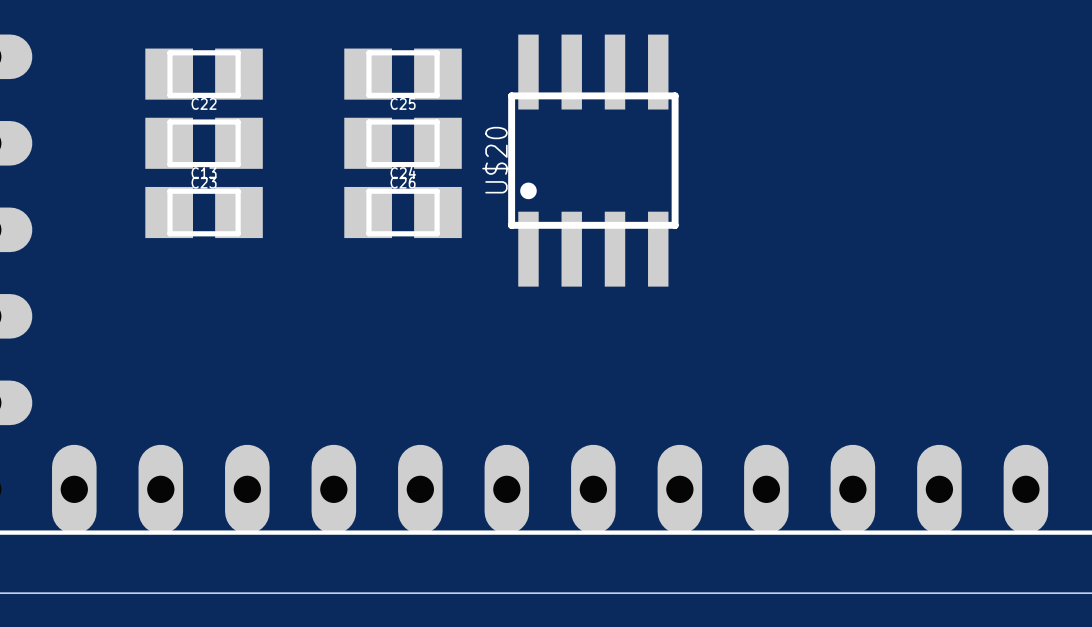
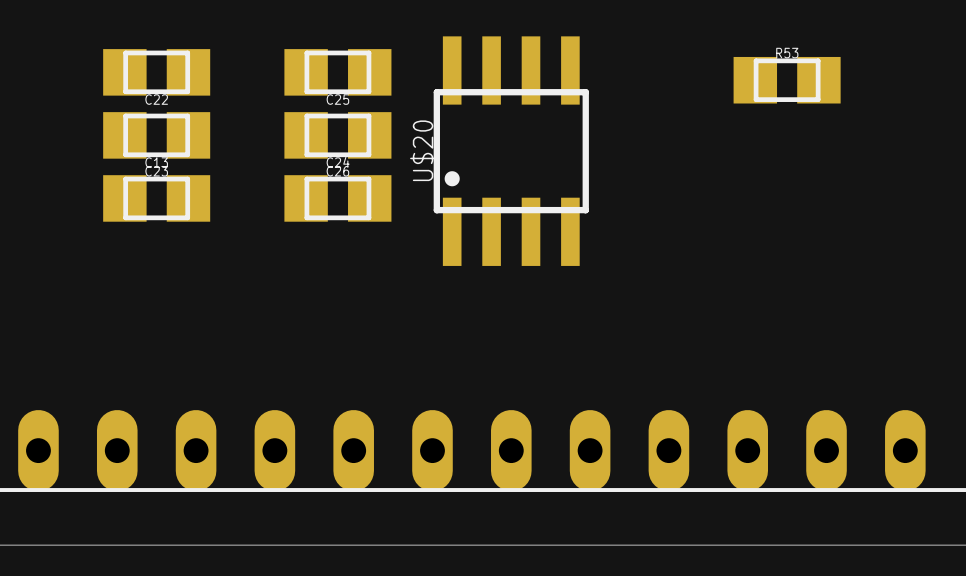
R53: none -> (787, 80)

